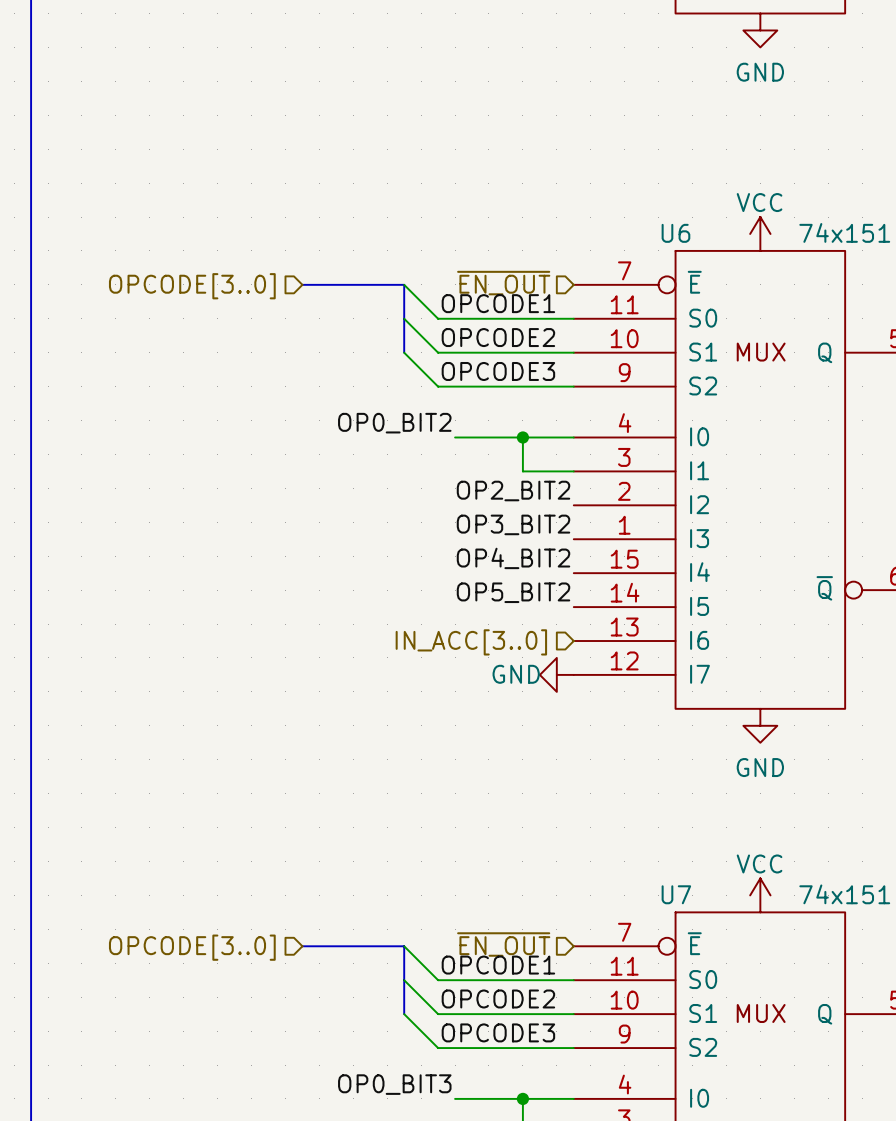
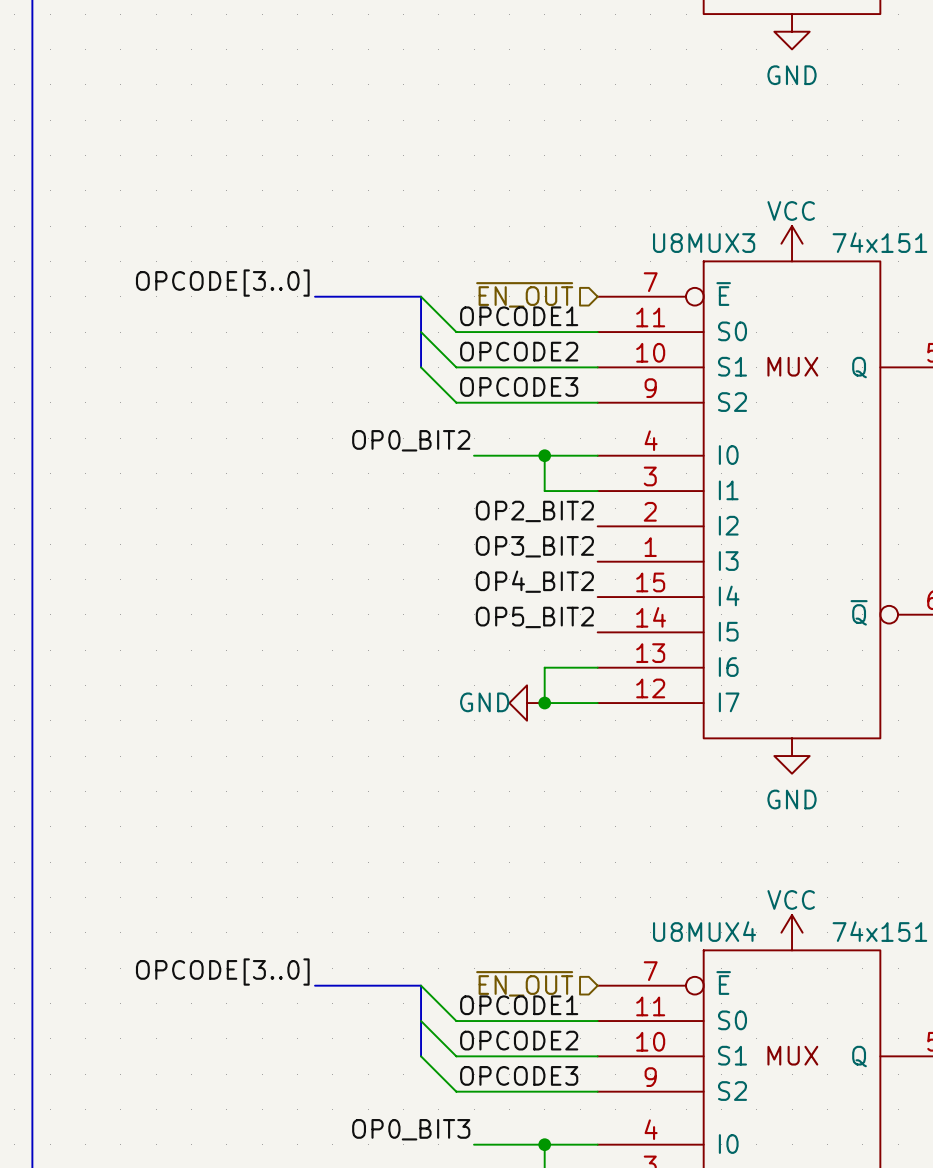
U6 name: U6 (675, 233) -> U8MUX3 (704, 243)
label: none -> OPCODE[3..0] (222, 283)
hierarchical label: OPCODE[3..0] (192, 286) -> none
wire: none -> (597, 667) (544, 667) (544, 703) (597, 703)
hierarchical label: IN_ACC[3..0] (471, 642) -> none
junction: none -> (544, 703)
power symbol position: GND (556, 674) -> GND (527, 703)
U7 name: U7 (676, 894) -> U8MUX4 (704, 931)
label: none -> OPCODE[3..0] (222, 972)
hierarchical label: OPCODE[3..0] (192, 947) -> none

